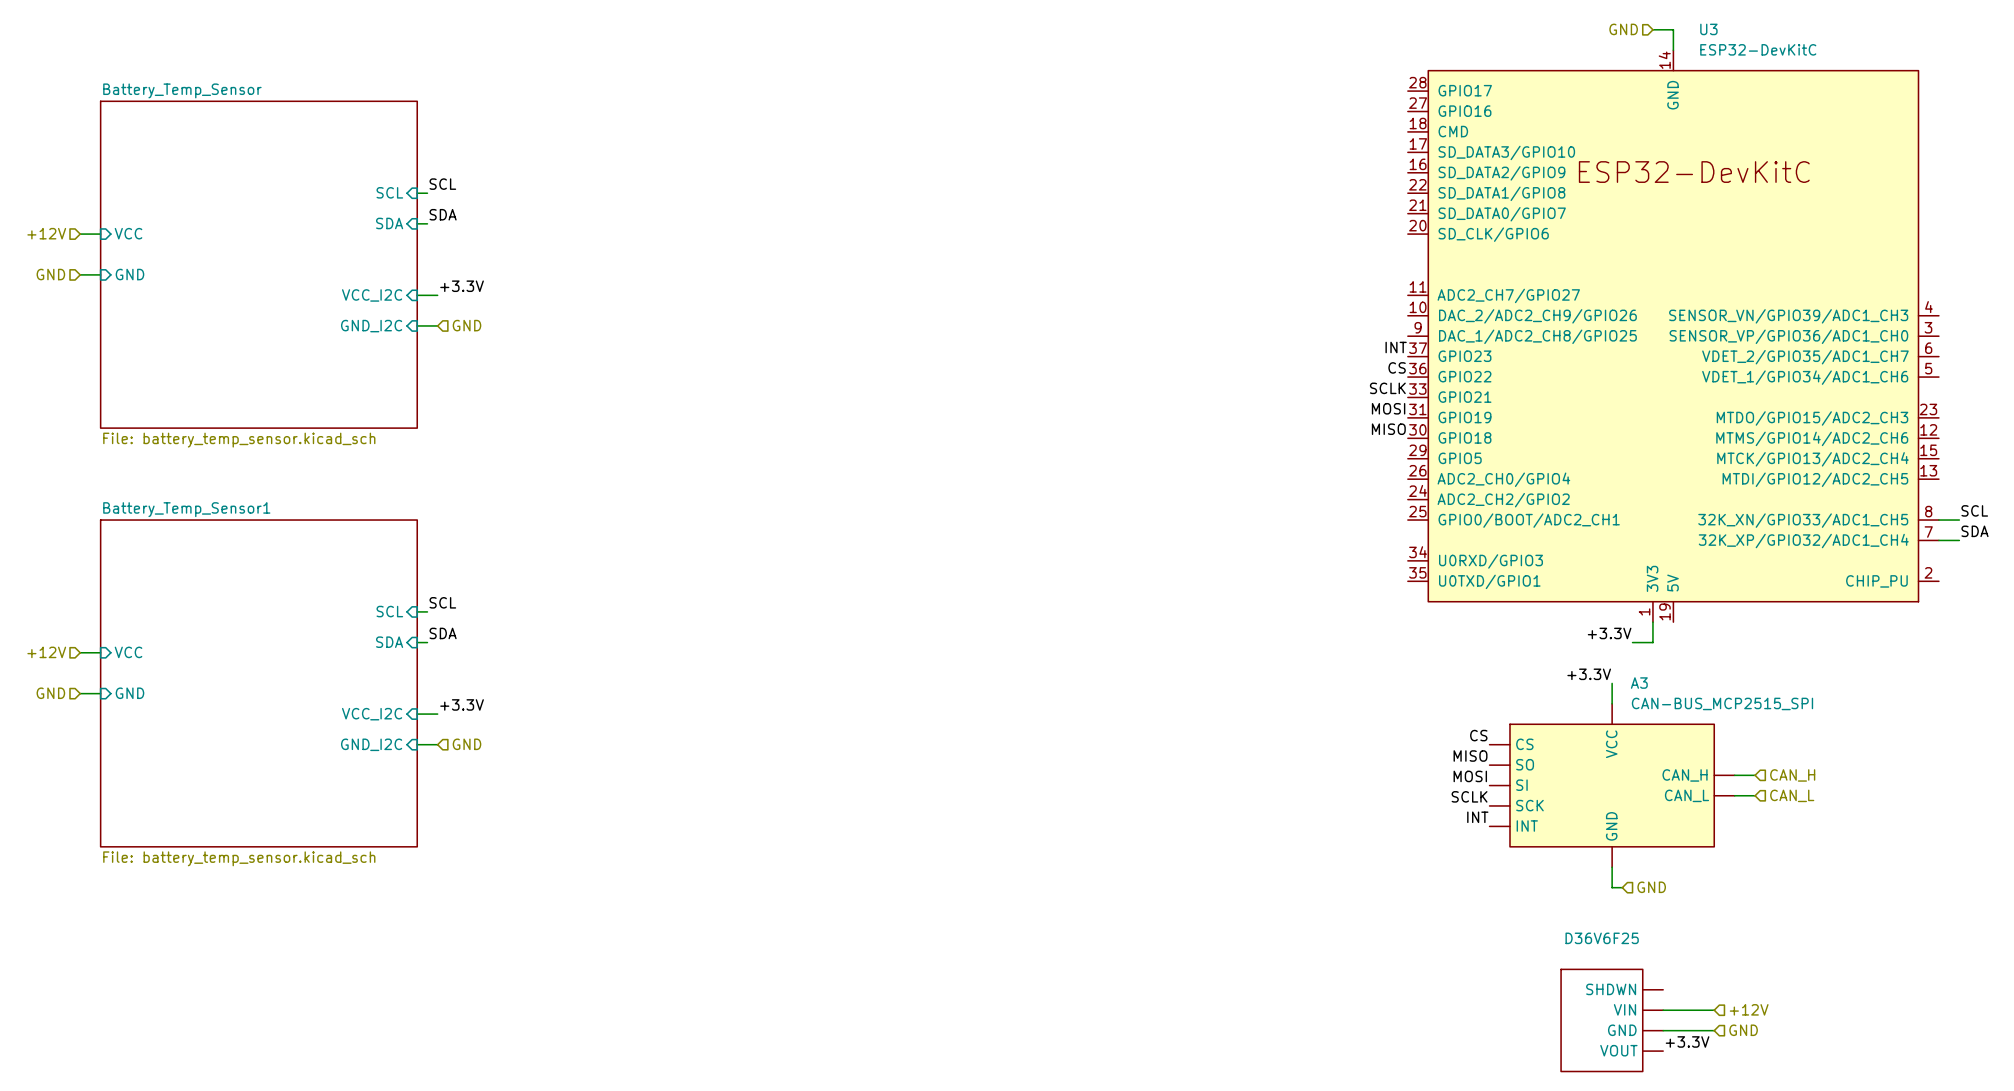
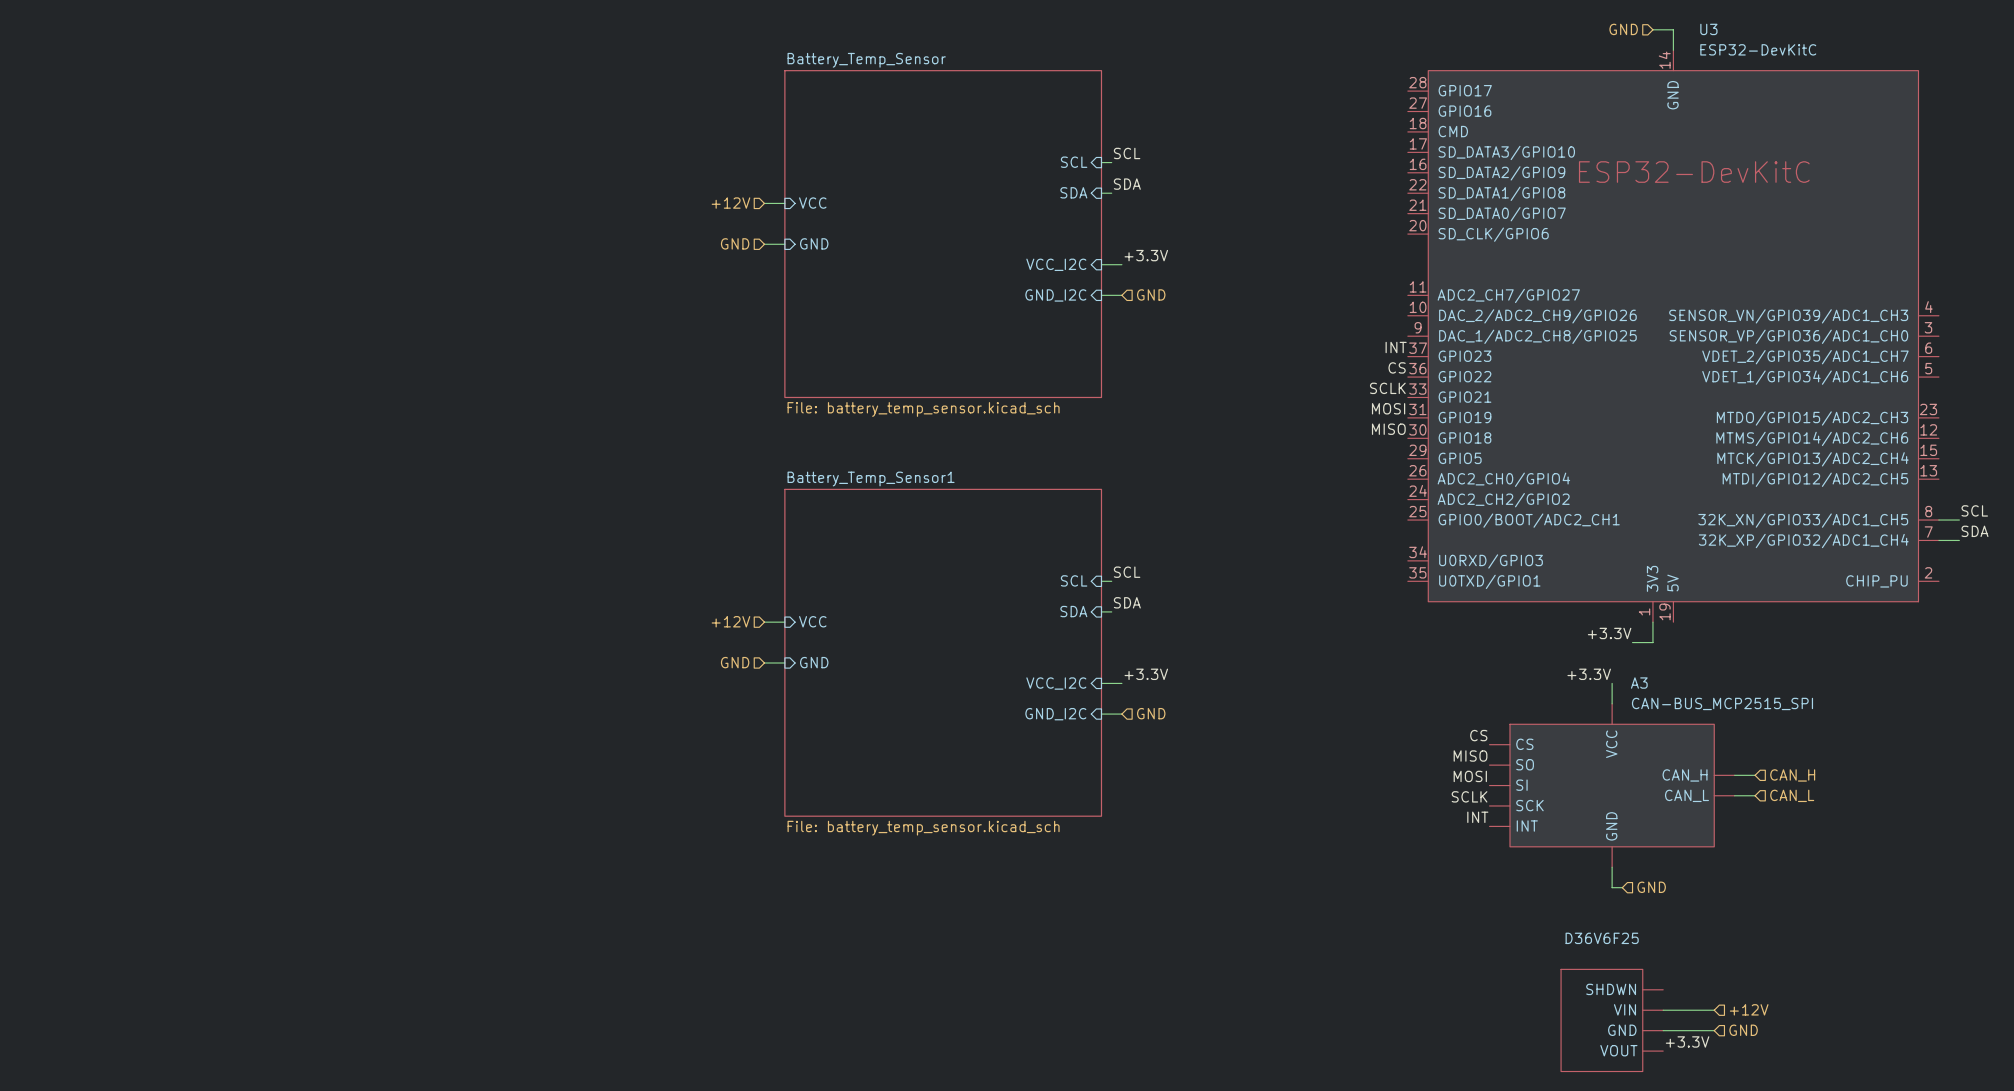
label: none -> SCL (1127, 153)
sheet pin: none -> SCL (1074, 162)
wire: none -> (1101, 162) (1111, 162)
label: SCL (442, 184) -> none
label: none -> SDA (1127, 184)
sheet pin: SCL (389, 192) -> none
sheet pin: none -> SDA (1073, 192)
wire: (417, 193) (427, 193) -> none
wire: none -> (1101, 193) (1111, 193)
hierarchical label: none -> +12V (730, 203)
wire: none -> (764, 203) (784, 203)
sheet pin: none -> VCC (812, 203)
label: SDA (443, 214) -> none
sheet pin: SDA (389, 223) -> none
wire: (417, 223) (427, 223) -> none
hierarchical label: +12V (46, 233) -> none
sheet pin: VCC (128, 233) -> none
wire: (80, 234) (100, 234) -> none
sheet Battery_Temp_Sensor: none -> File: battery_temp_sensor.kicad_sch (943, 234)
hierarchical label: none -> GND (735, 243)
sheet pin: none -> GND (814, 243)
wire: none -> (764, 244) (784, 244)
label: none -> +3.3V (1146, 255)
sheet Battery_Temp_Sensor: File: battery_temp_sensor.kicad_sch (258, 264) -> none
sheet pin: none -> VCC_I2C (1056, 264)
wire: none -> (1101, 264) (1121, 264)
hierarchical label: GND (50, 274) -> none
wire: (80, 274) (100, 274) -> none
sheet pin: GND (129, 274) -> none
label: +3.3V (462, 286) -> none
hierarchical label: none -> GND (1151, 294)
sheet pin: VCC_I2C (372, 295) -> none
wire: (417, 295) (437, 295) -> none
sheet pin: none -> GND_I2C (1055, 295)
wire: none -> (1101, 295) (1121, 295)
wire: (417, 325) (437, 325) -> none
hierarchical label: GND (466, 325) -> none
sheet pin: GND_I2C (371, 326) -> none
label: none -> SCL (1127, 572)
sheet pin: none -> SCL (1074, 580)
wire: none -> (1101, 581) (1111, 581)
label: SCL (442, 602) -> none
label: none -> SDA (1127, 602)
sheet pin: SCL (389, 611) -> none
wire: (417, 611) (427, 611) -> none
sheet pin: none -> SDA (1073, 611)
wire: none -> (1101, 611) (1111, 611)
hierarchical label: none -> +12V (730, 621)
sheet pin: none -> VCC (812, 621)
wire: none -> (764, 622) (784, 622)
label: SDA (443, 633) -> none
sheet pin: SDA (389, 642) -> none
wire: (417, 642) (427, 642) -> none
hierarchical label: +12V (46, 652) -> none
wire: (80, 652) (100, 652) -> none
sheet pin: VCC (128, 652) -> none
hierarchical label: none -> GND (735, 662)
sheet pin: none -> GND (814, 662)
wire: none -> (764, 663) (784, 663)
label: none -> +3.3V (1146, 674)
sheet Battery_Temp_Sensor1 position: (258, 683) -> (943, 652)
sheet pin: none -> VCC_I2C (1056, 683)
wire: none -> (1101, 683) (1121, 683)
hierarchical label: GND (50, 693) -> none
wire: (80, 693) (100, 693) -> none
sheet pin: GND (129, 693) -> none
label: +3.3V (462, 704) -> none
hierarchical label: none -> GND (1151, 713)
sheet pin: VCC_I2C (372, 714) -> none
wire: (417, 714) (437, 714) -> none
sheet pin: none -> GND_I2C (1055, 714)
wire: none -> (1101, 714) (1121, 714)
sheet pin: GND_I2C (371, 744) -> none
wire: (417, 744) (437, 744) -> none
hierarchical label: GND (466, 744) -> none

